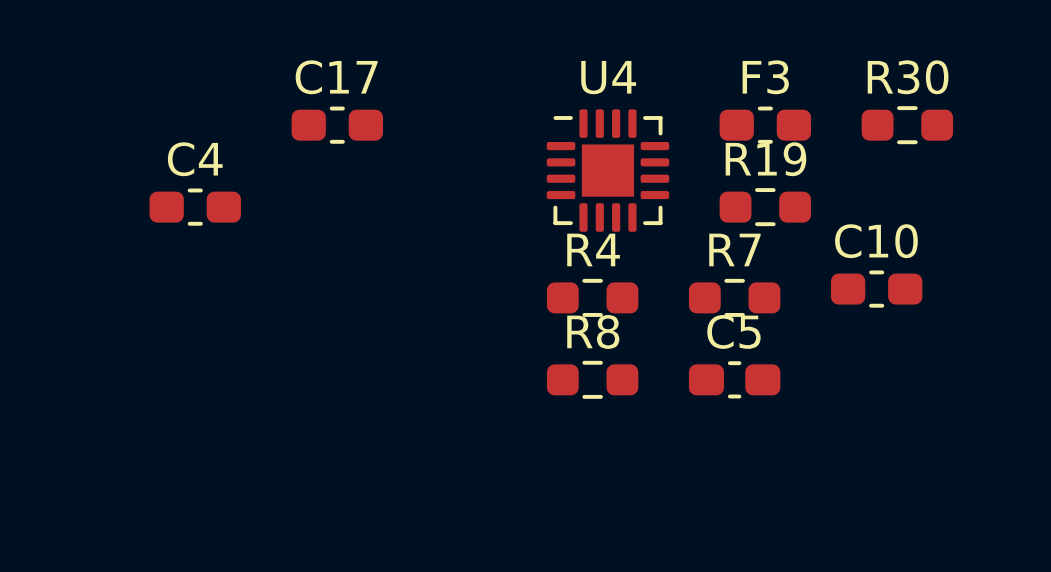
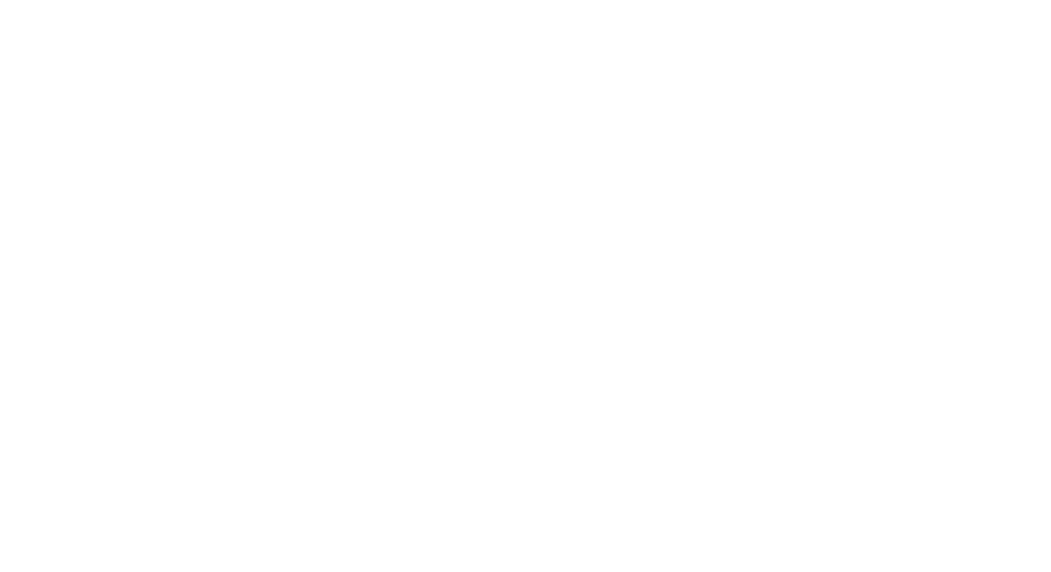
C17: (337, 125) -> none
F3: (765, 125) -> none
R30: (907, 125) -> none
U4: (607, 170) -> none
C4: (195, 207) -> none
R19: (765, 207) -> none
C10: (876, 289) -> none
R4: (592, 297) -> none
R7: (734, 297) -> none
R8: (592, 379) -> none
C5: (734, 379) -> none

